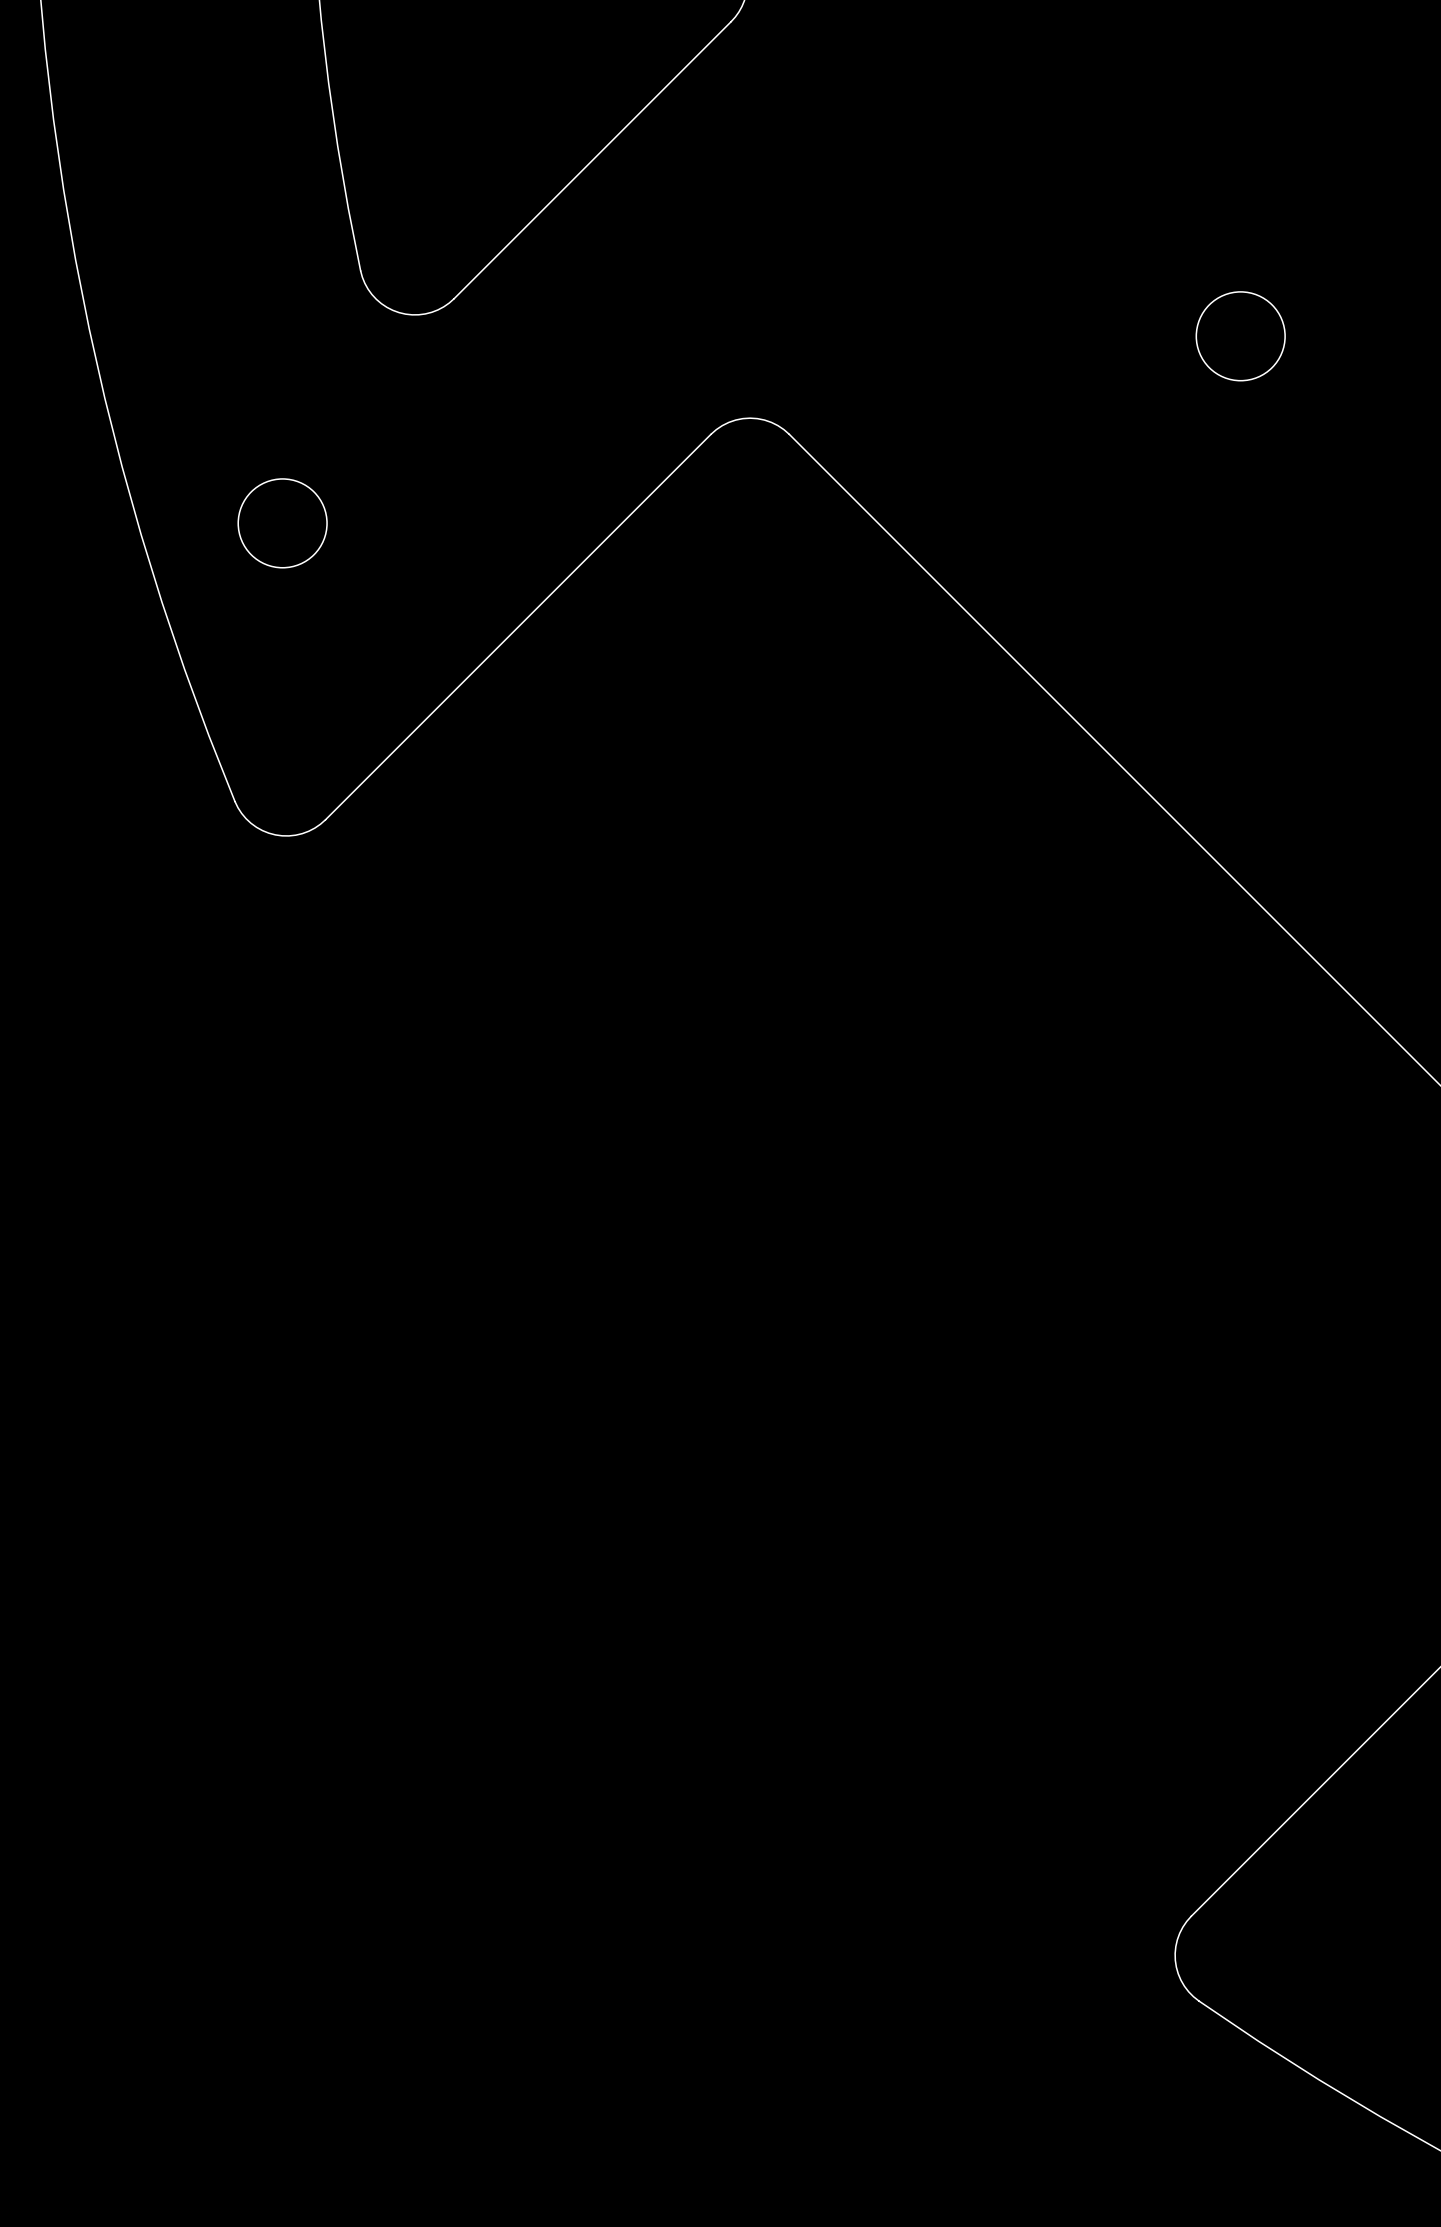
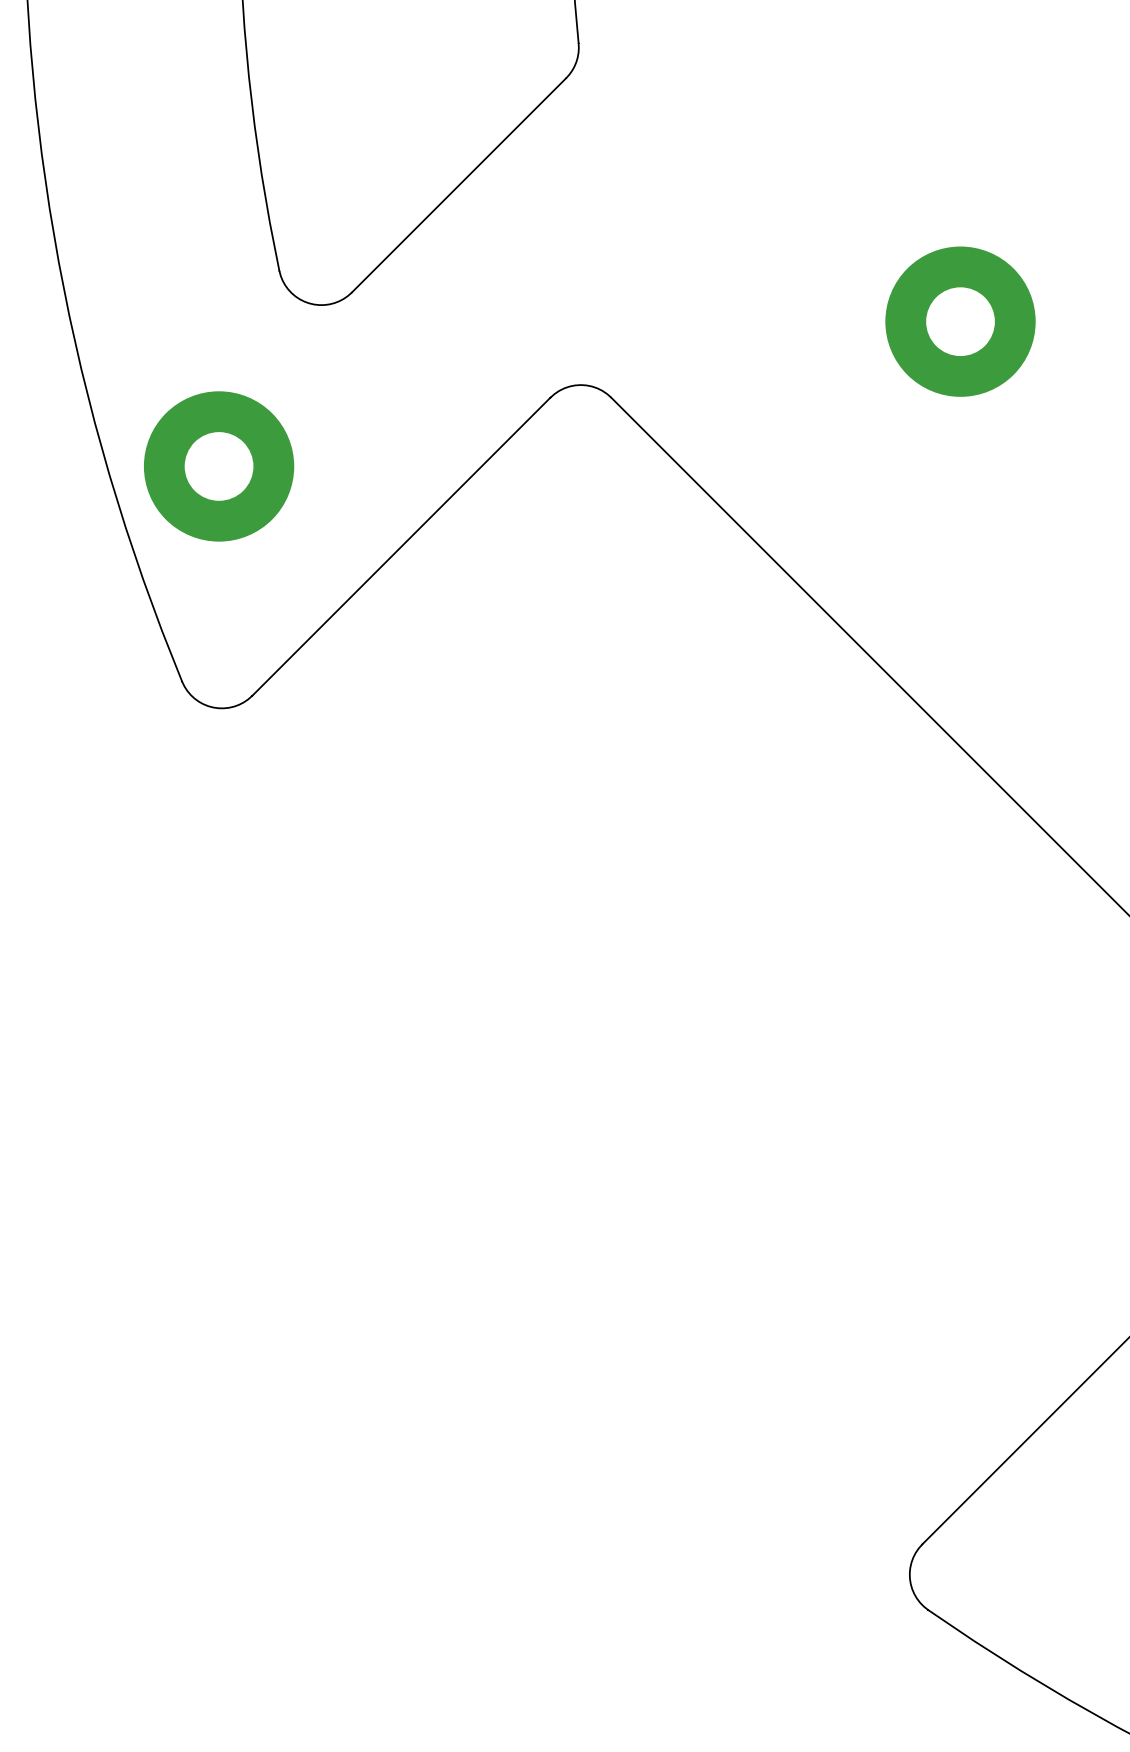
round board edge: [1196, 291, 1286, 381] -> none
via: none -> (960, 321)
round board edge: [238, 478, 328, 568] -> none
via: none -> (219, 466)

